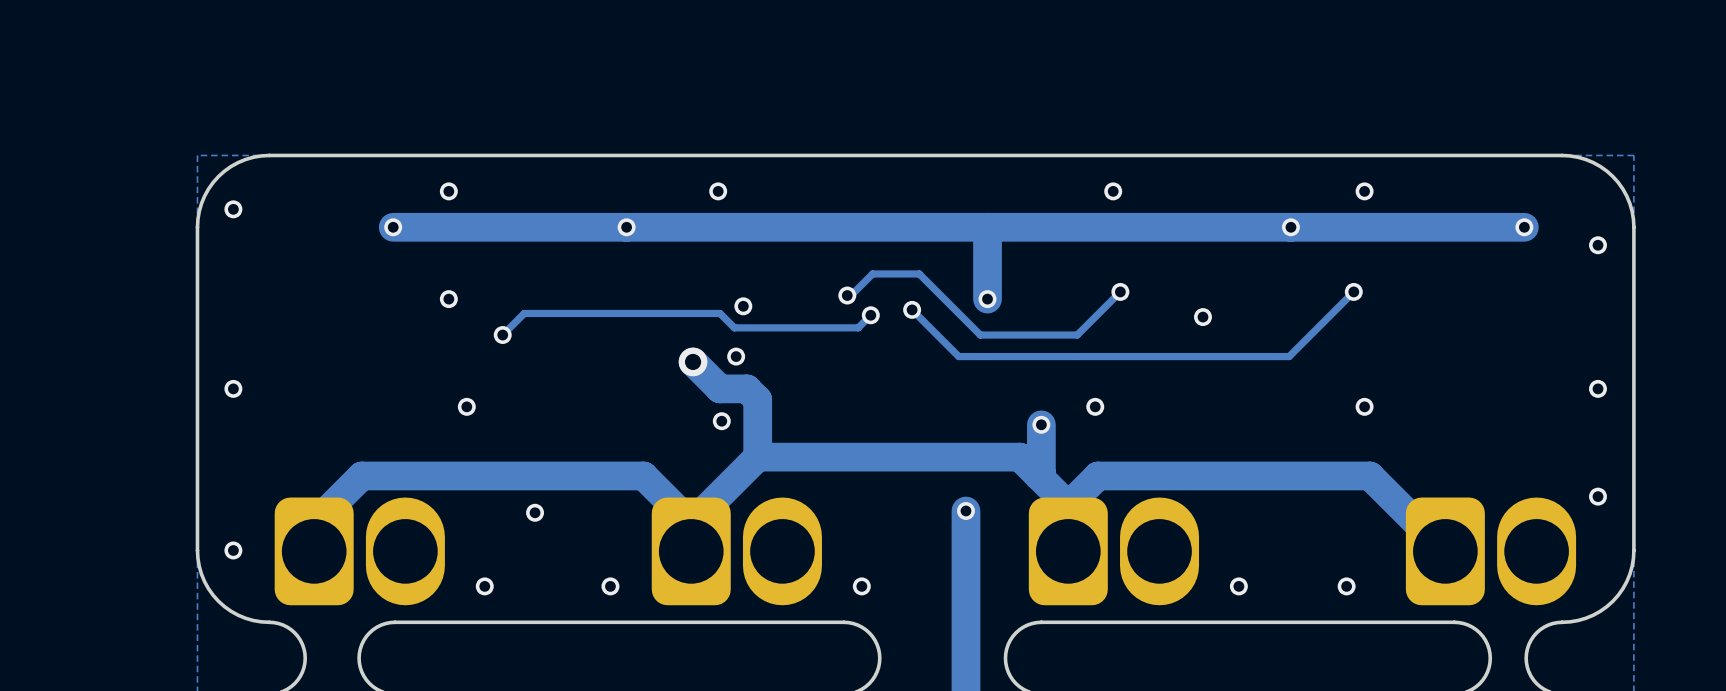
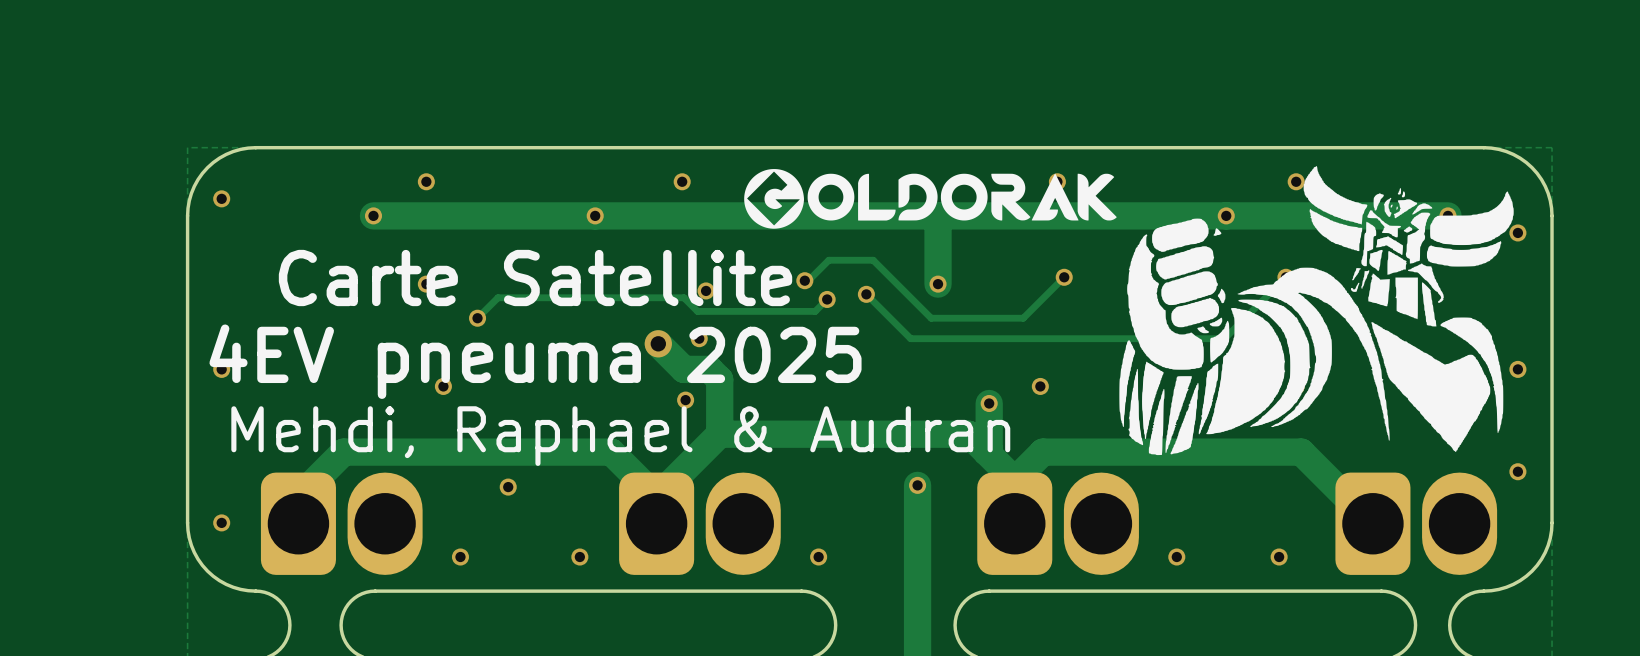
drawing: none -> [744, 166, 1514, 456]
text: none -> Carte Satellite (535, 278)
text: none -> 4EV pneuma 2025 (535, 361)
text: none -> Mehdi, Raphael & Audran (620, 436)

